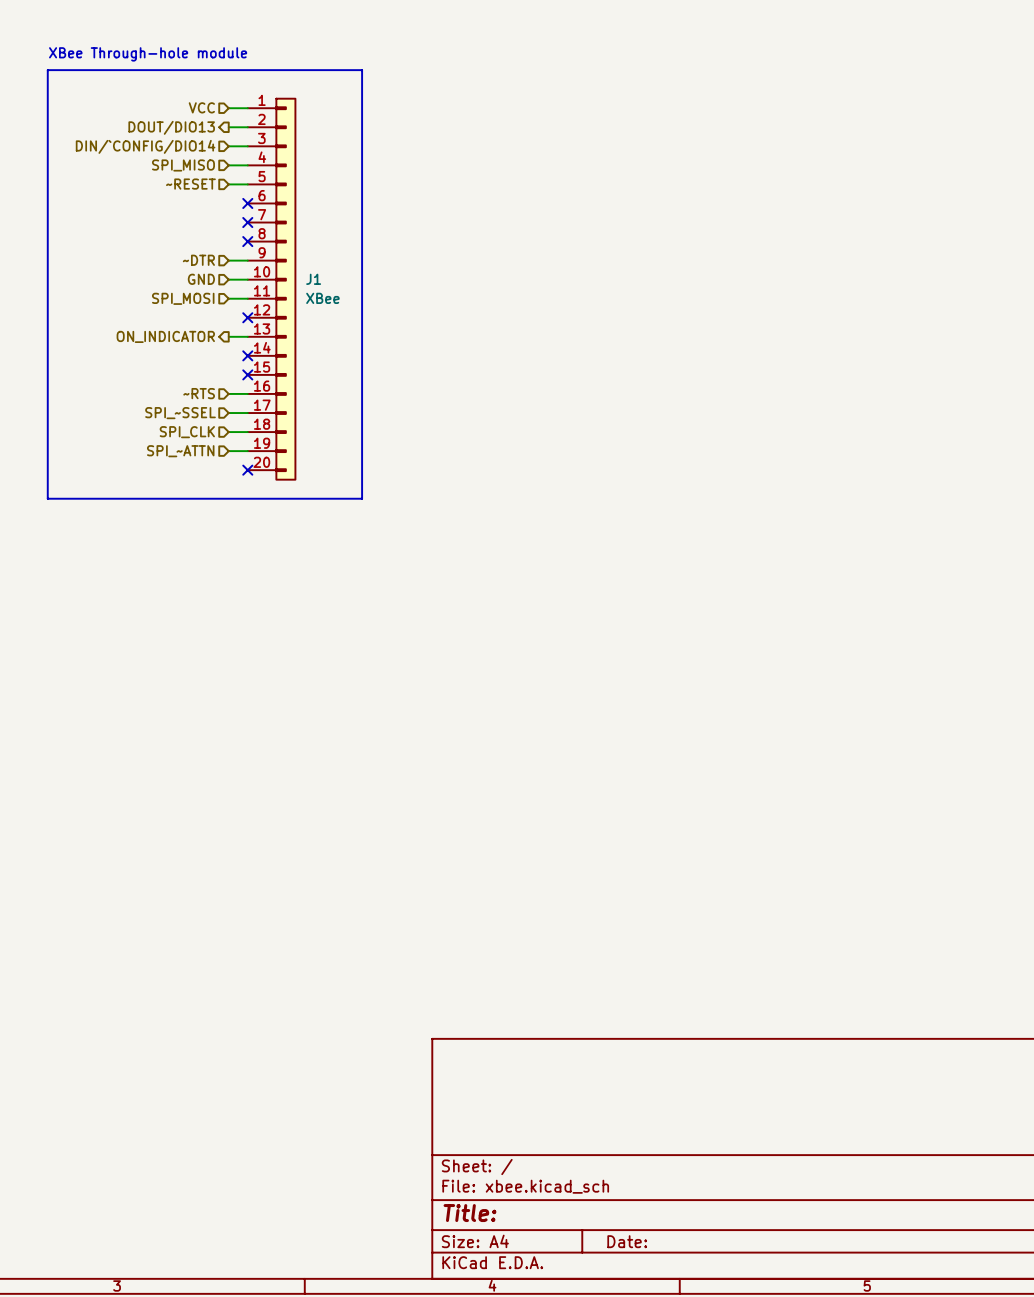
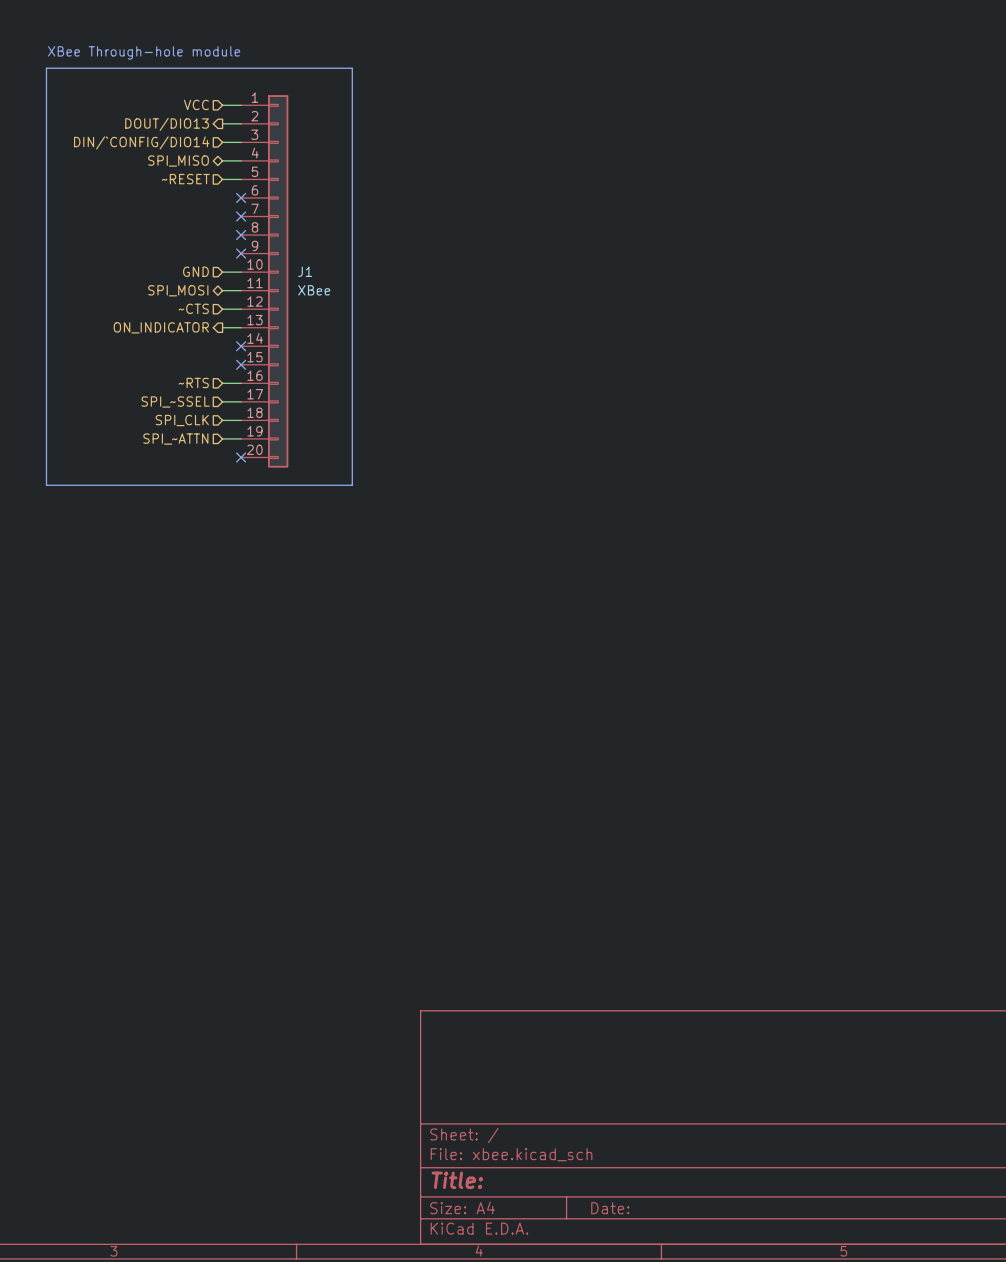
hierarchical label shape: input (183, 165) -> bidirectional (178, 161)
hierarchical label: ~DTR (198, 260) -> none
wire: (228, 260) (247, 260) -> (222, 309) (241, 309)
no-connect mark: none -> (241, 253)
hierarchical label shape: input (183, 298) -> bidirectional (178, 290)
hierarchical label: none -> ~CTS (193, 308)
no-connect mark: (247, 317) -> none

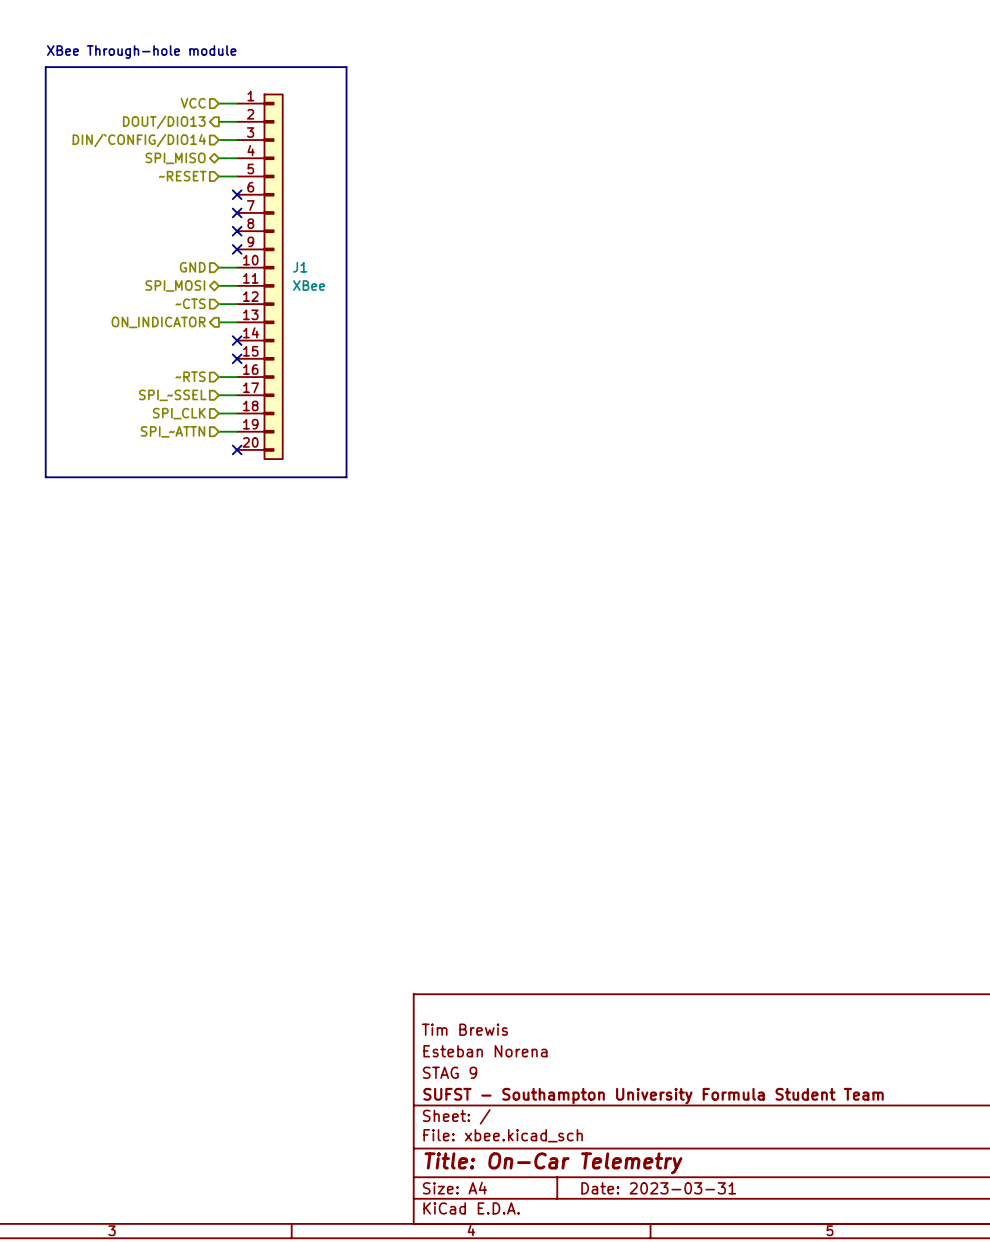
title block: none -> Tim Brewis (464, 1029)
title block: none -> Esteban Norena (485, 1051)
title block: none -> STAG 9 (450, 1072)
title block: none -> SUFST - Southampton University Formula Student Team (653, 1096)
title block: Title: (457, 1180) -> Title: On-Car Telemetry (553, 1163)
title block: Date: (610, 1208) -> Date: 2023-03-31 (658, 1188)

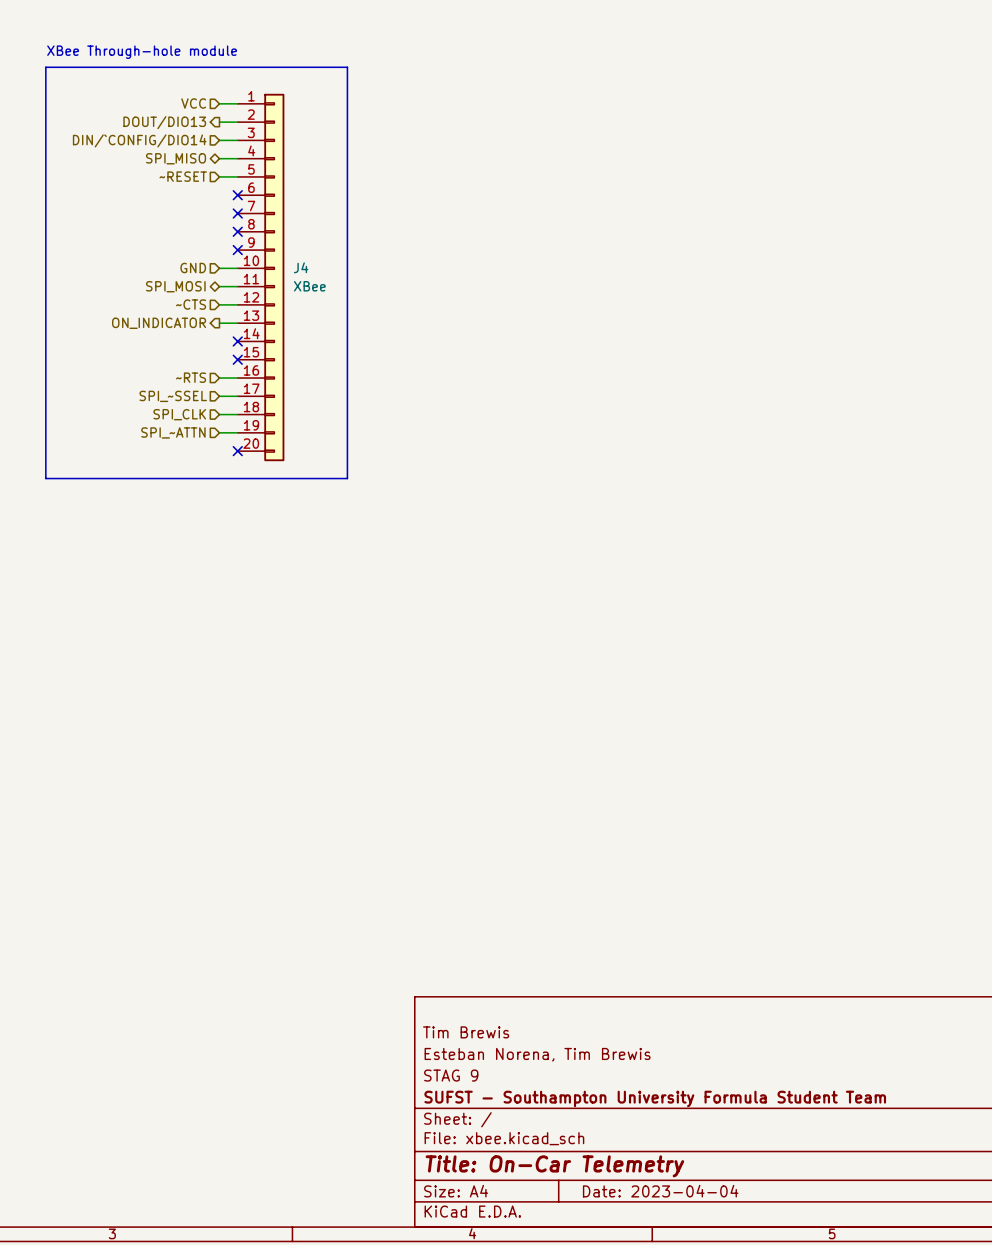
J1 name: J1 (300, 267) -> J4 (301, 267)
title block: Esteban Norena (485, 1051) -> Esteban Norena, Tim Brewis (537, 1054)
title block: Date: 2023-03-31 (658, 1188) -> Date: 2023-04-04 (660, 1191)

